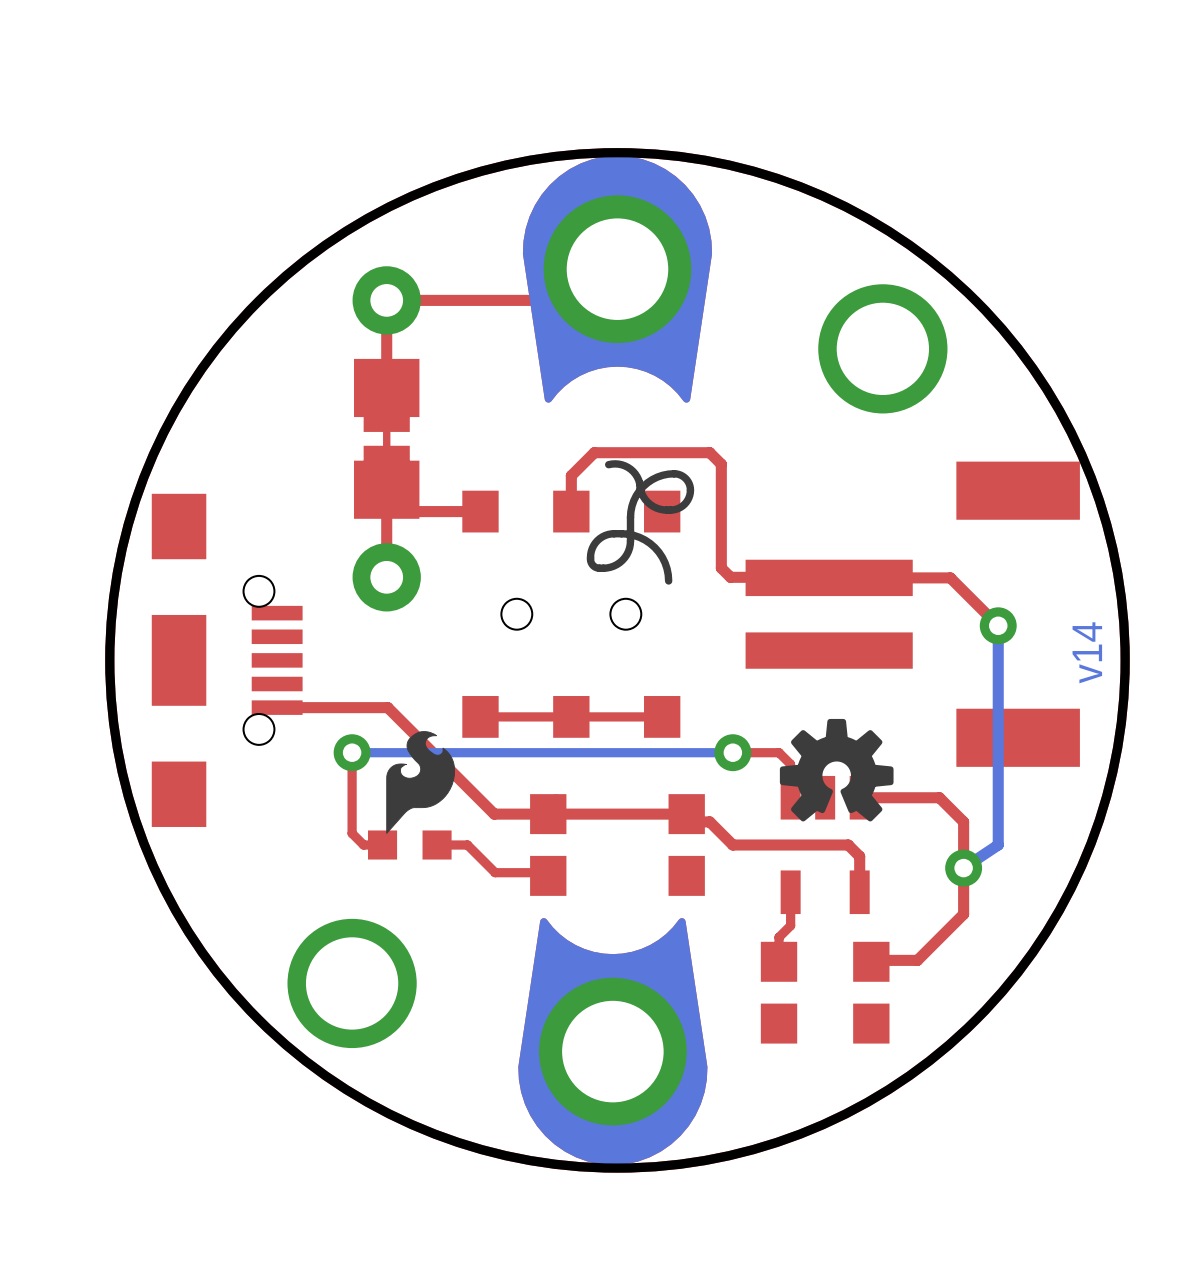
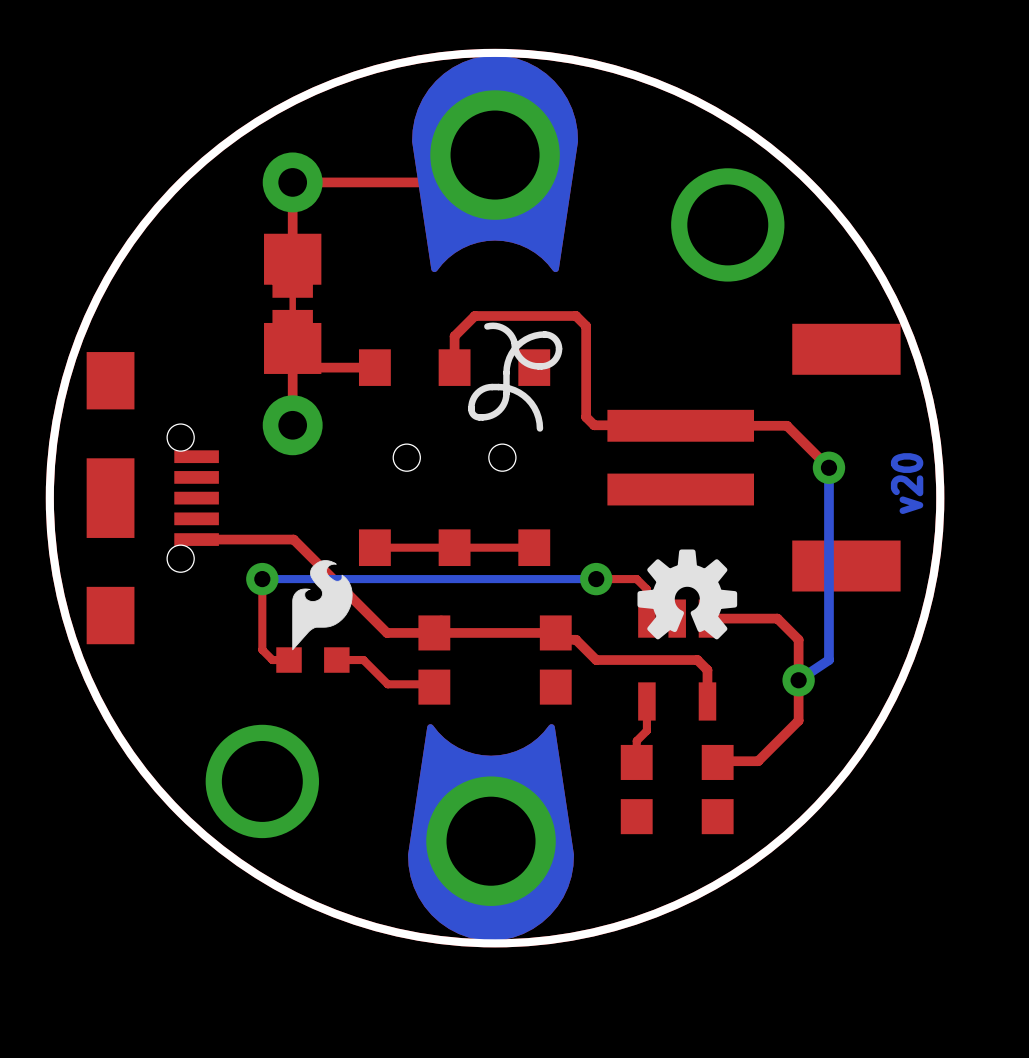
text: v14 (1087, 652) -> v20 (907, 483)

